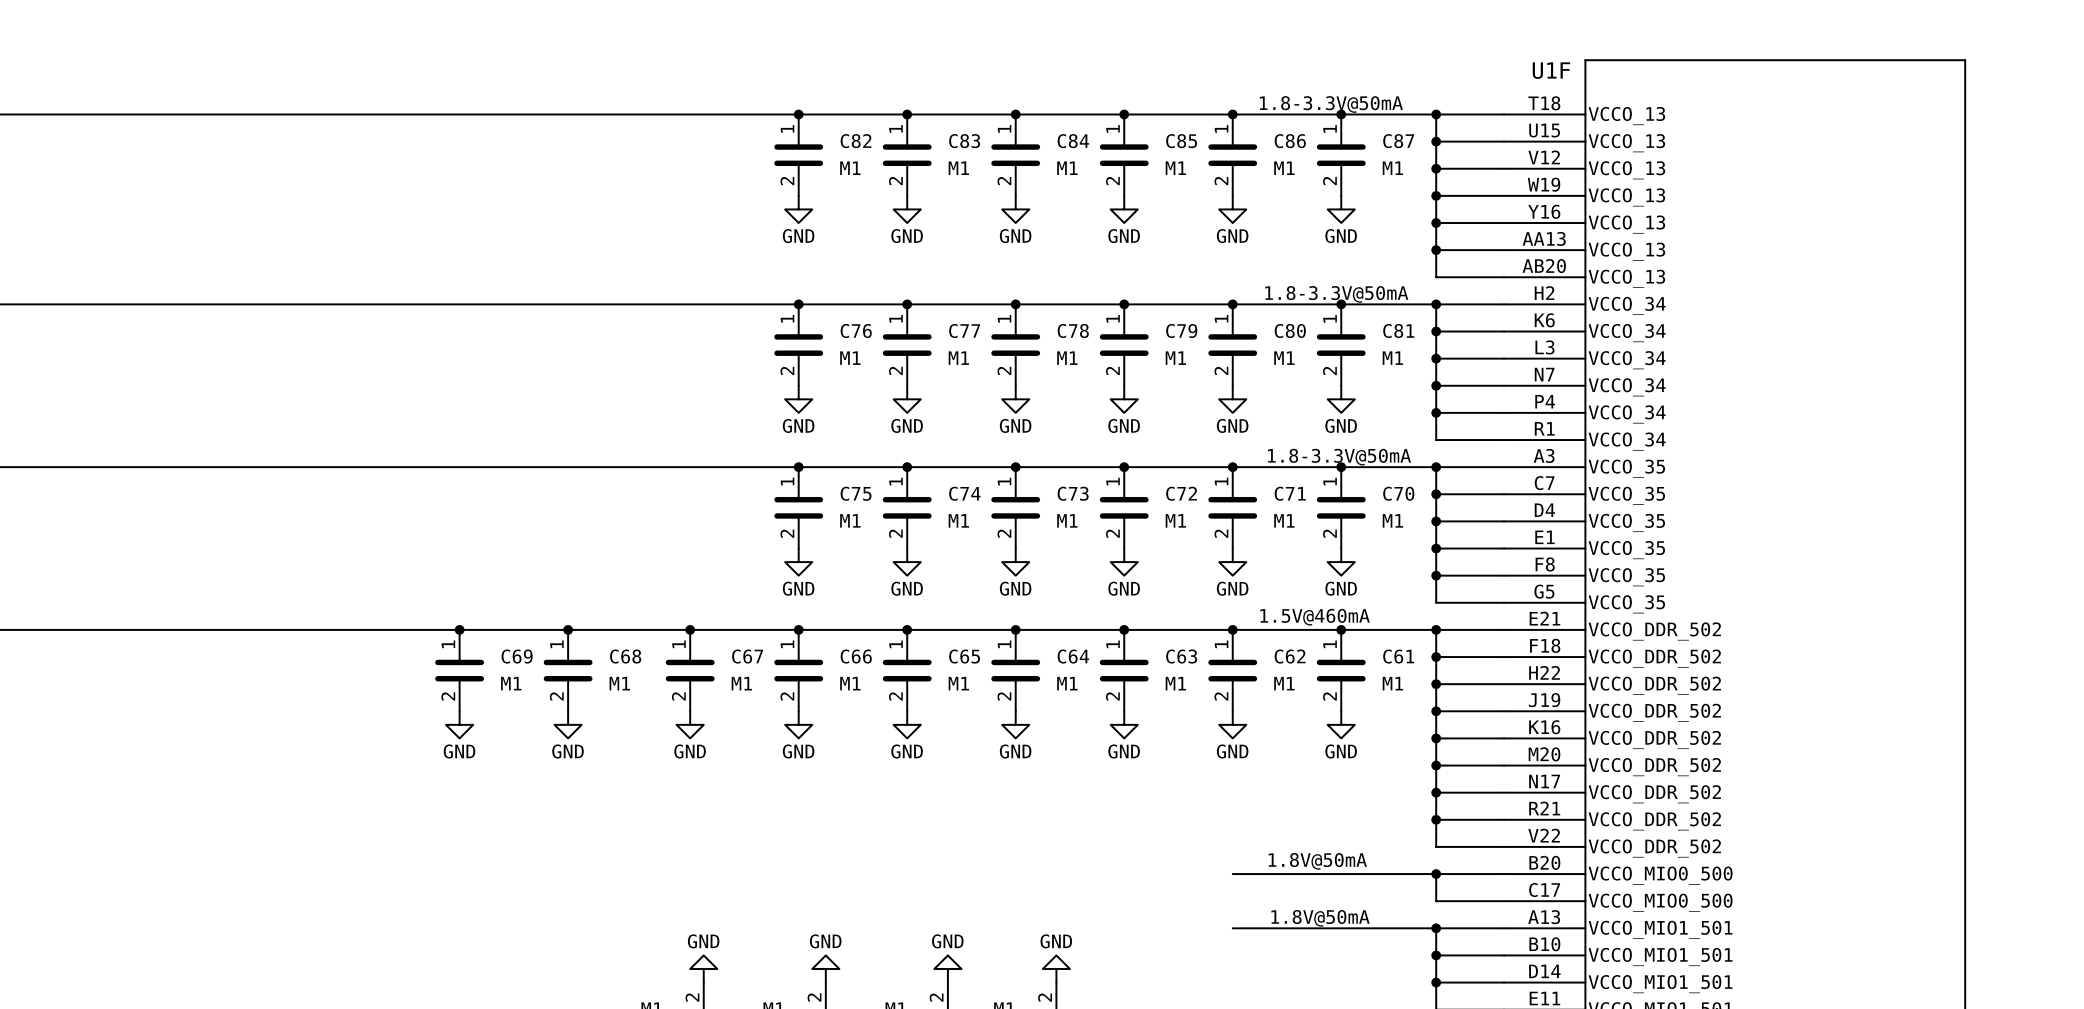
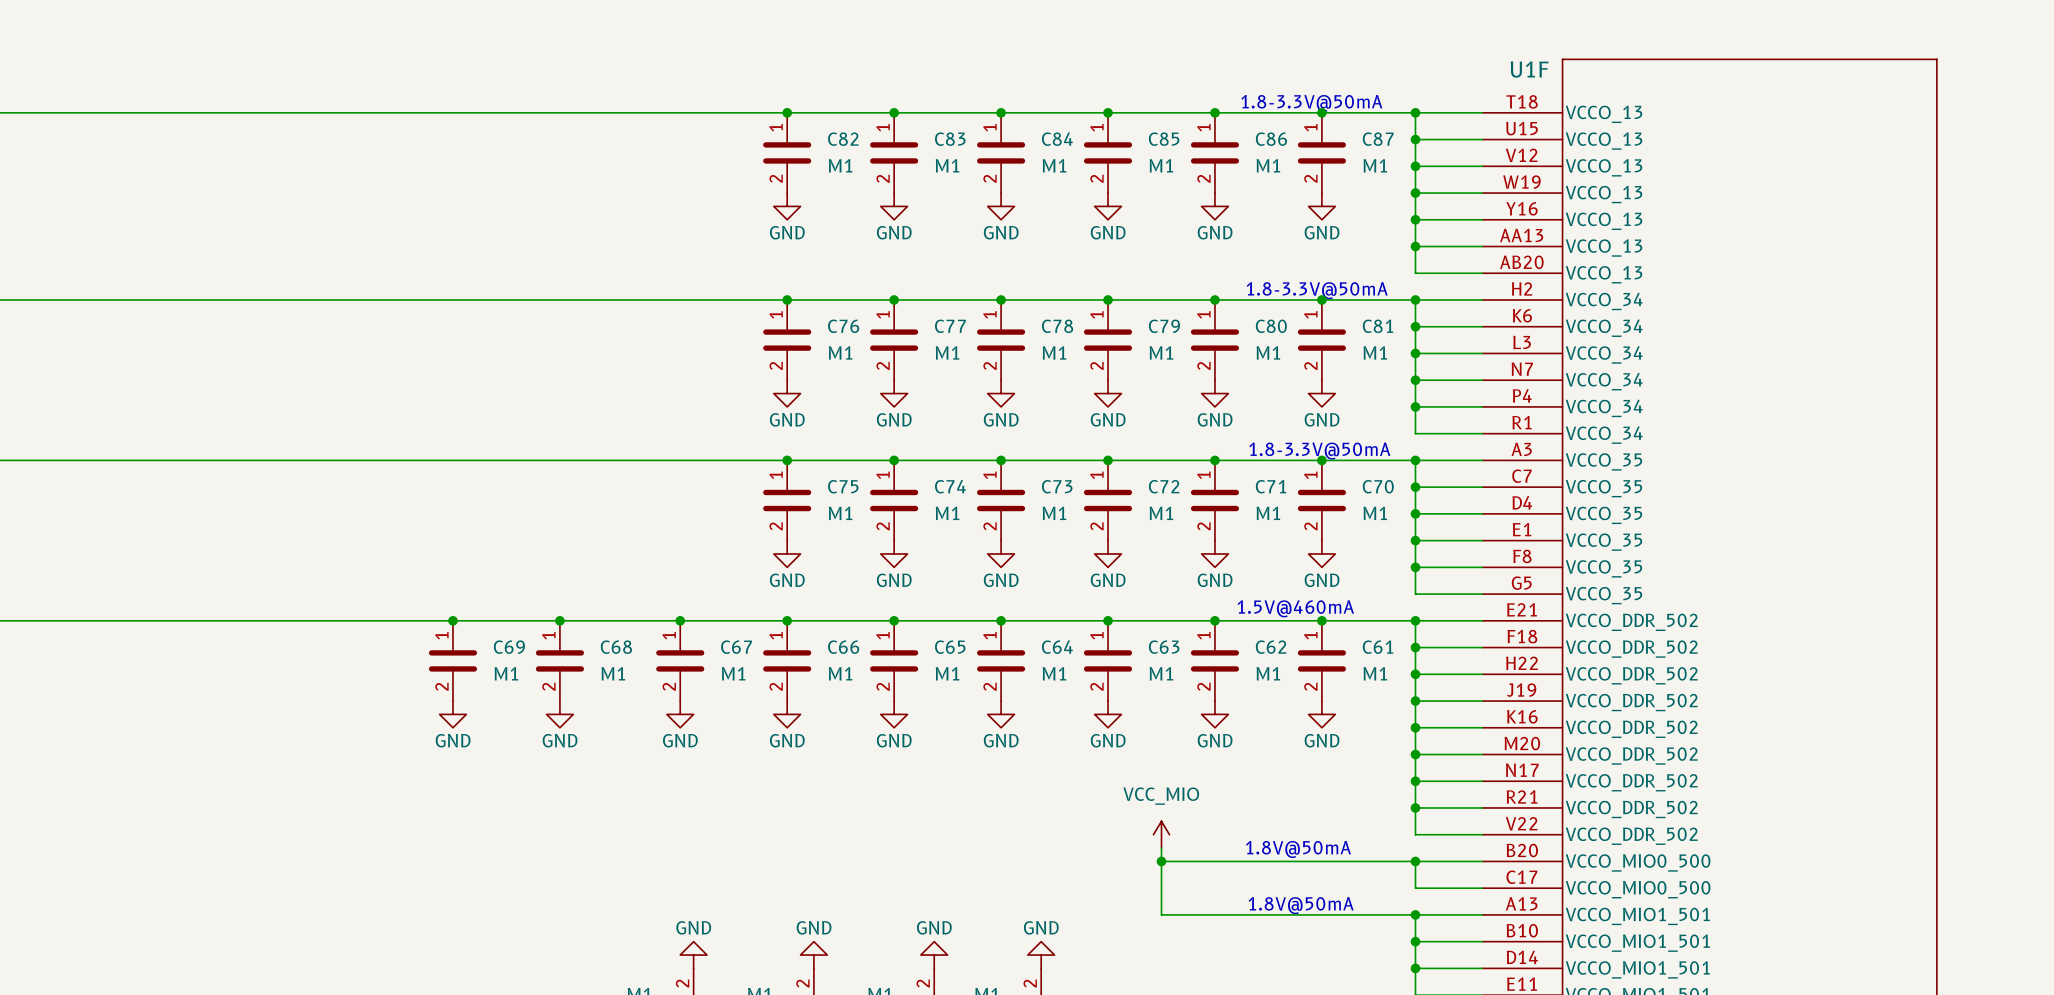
power symbol: none -> VCC_MIO (1161, 834)
wire: none -> (1161, 848) (1161, 914) (1214, 914)
wire: none -> (1161, 861) (1214, 861)
junction: none -> (1161, 861)

